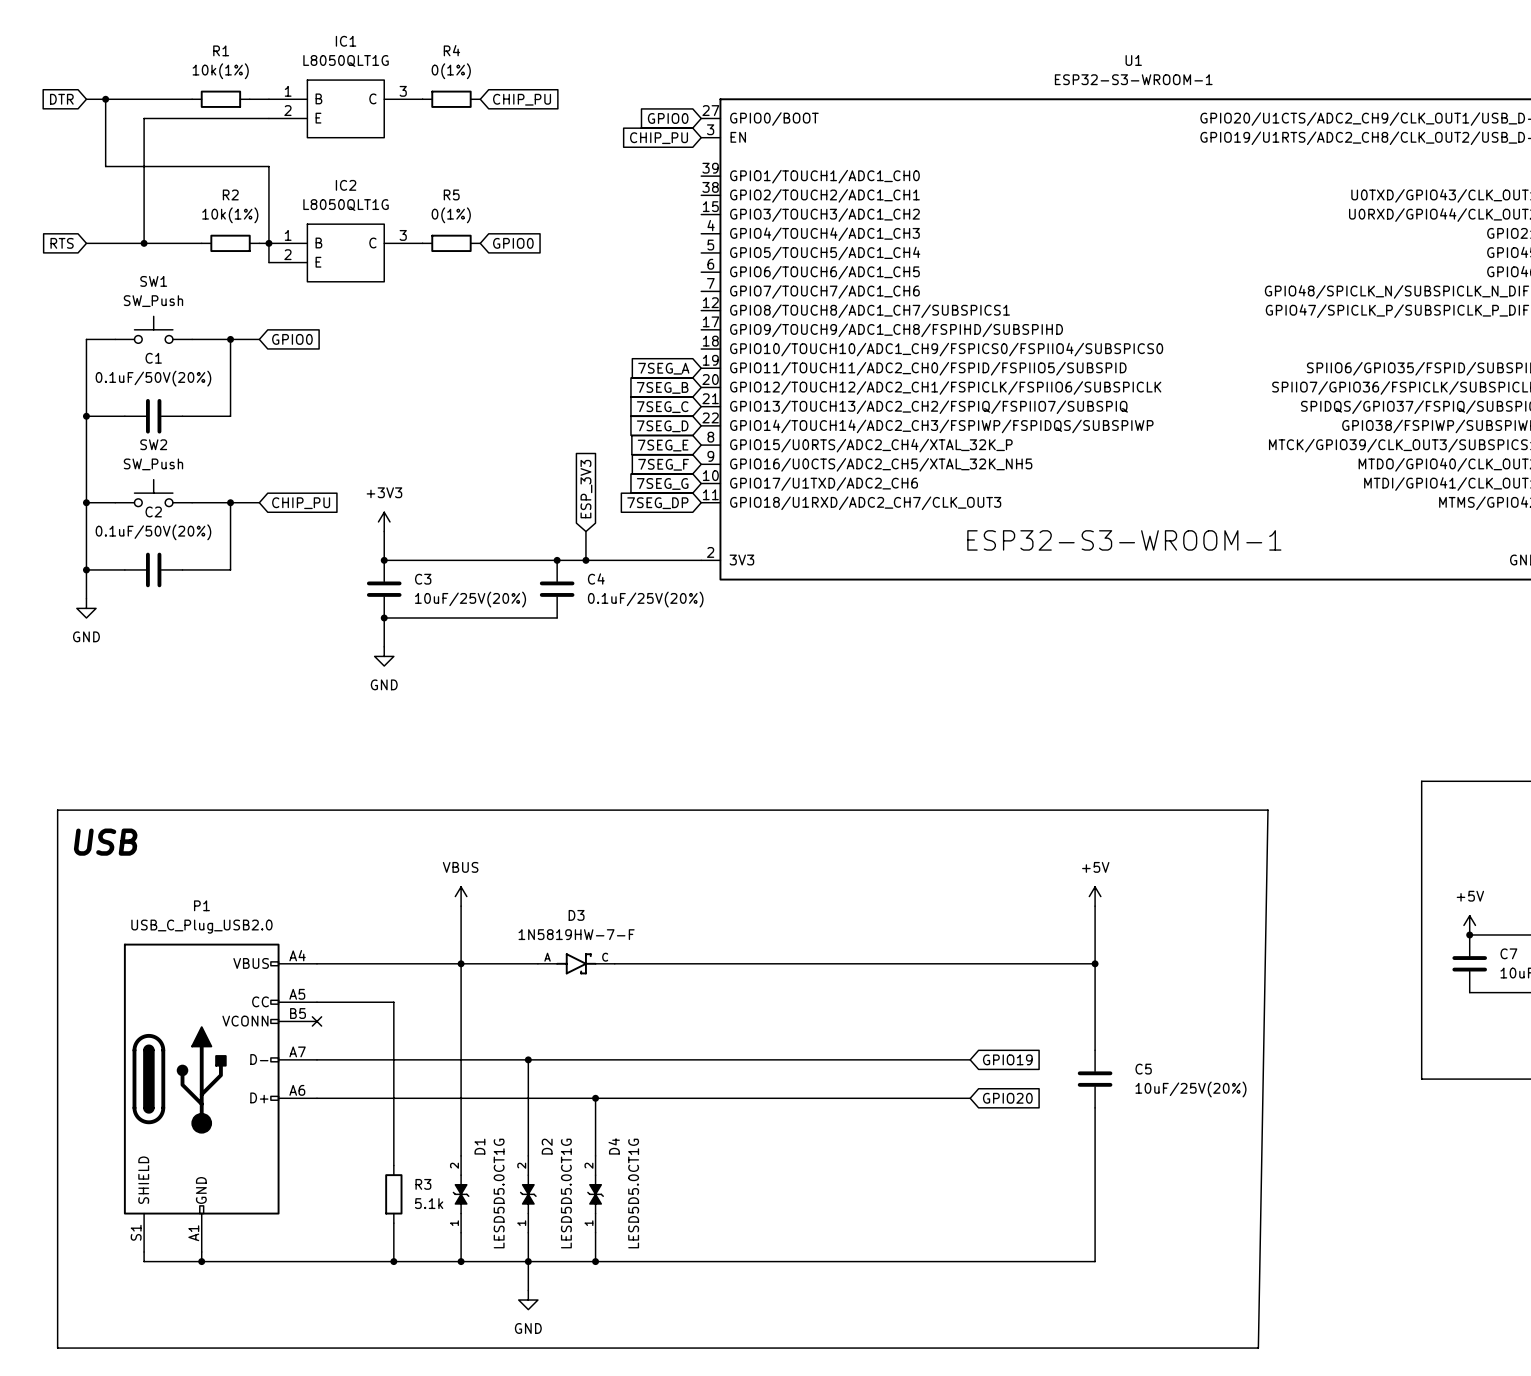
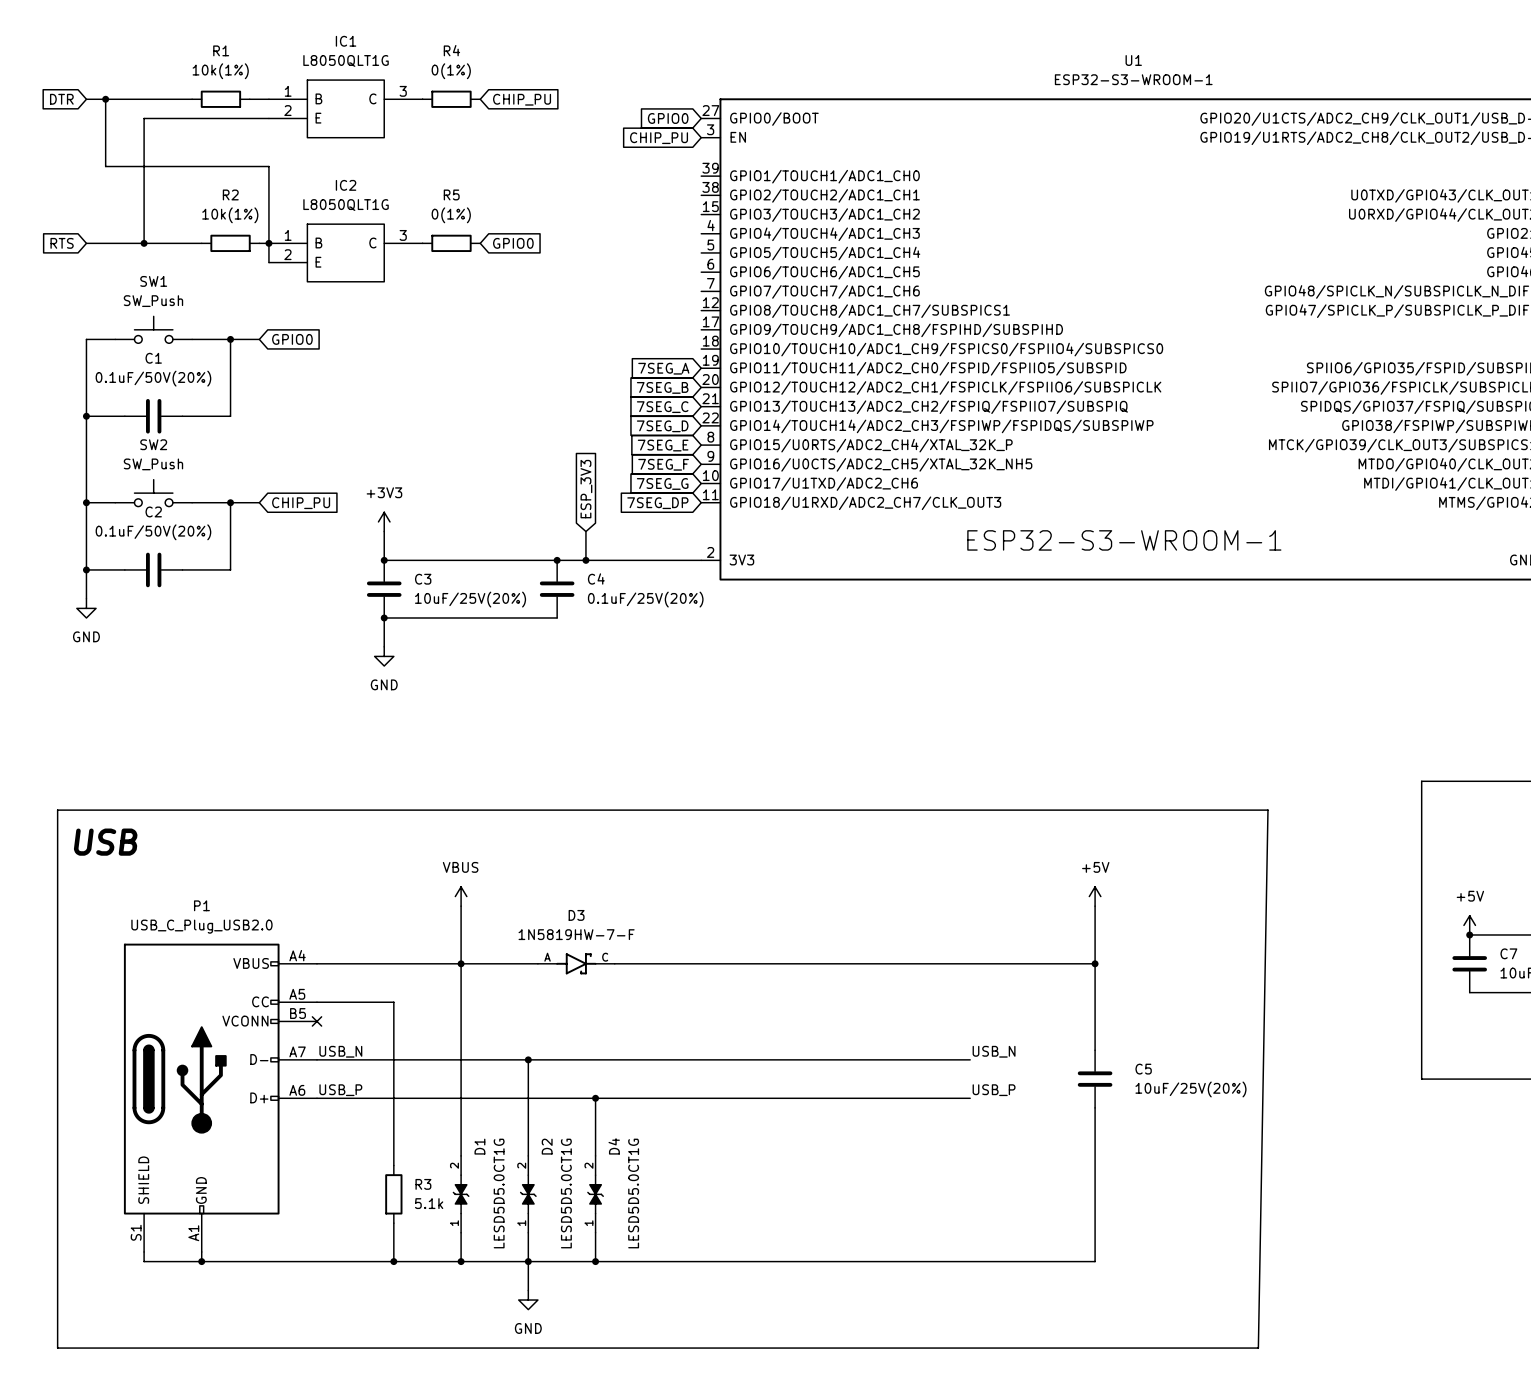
label: none -> USB_N (340, 1051)
label: none -> USB_N (994, 1051)
global label: GPIO19 (1007, 1059) -> none
label: none -> USB_P (340, 1090)
label: none -> USB_P (994, 1090)
global label: GPIO20 (1007, 1098) -> none

